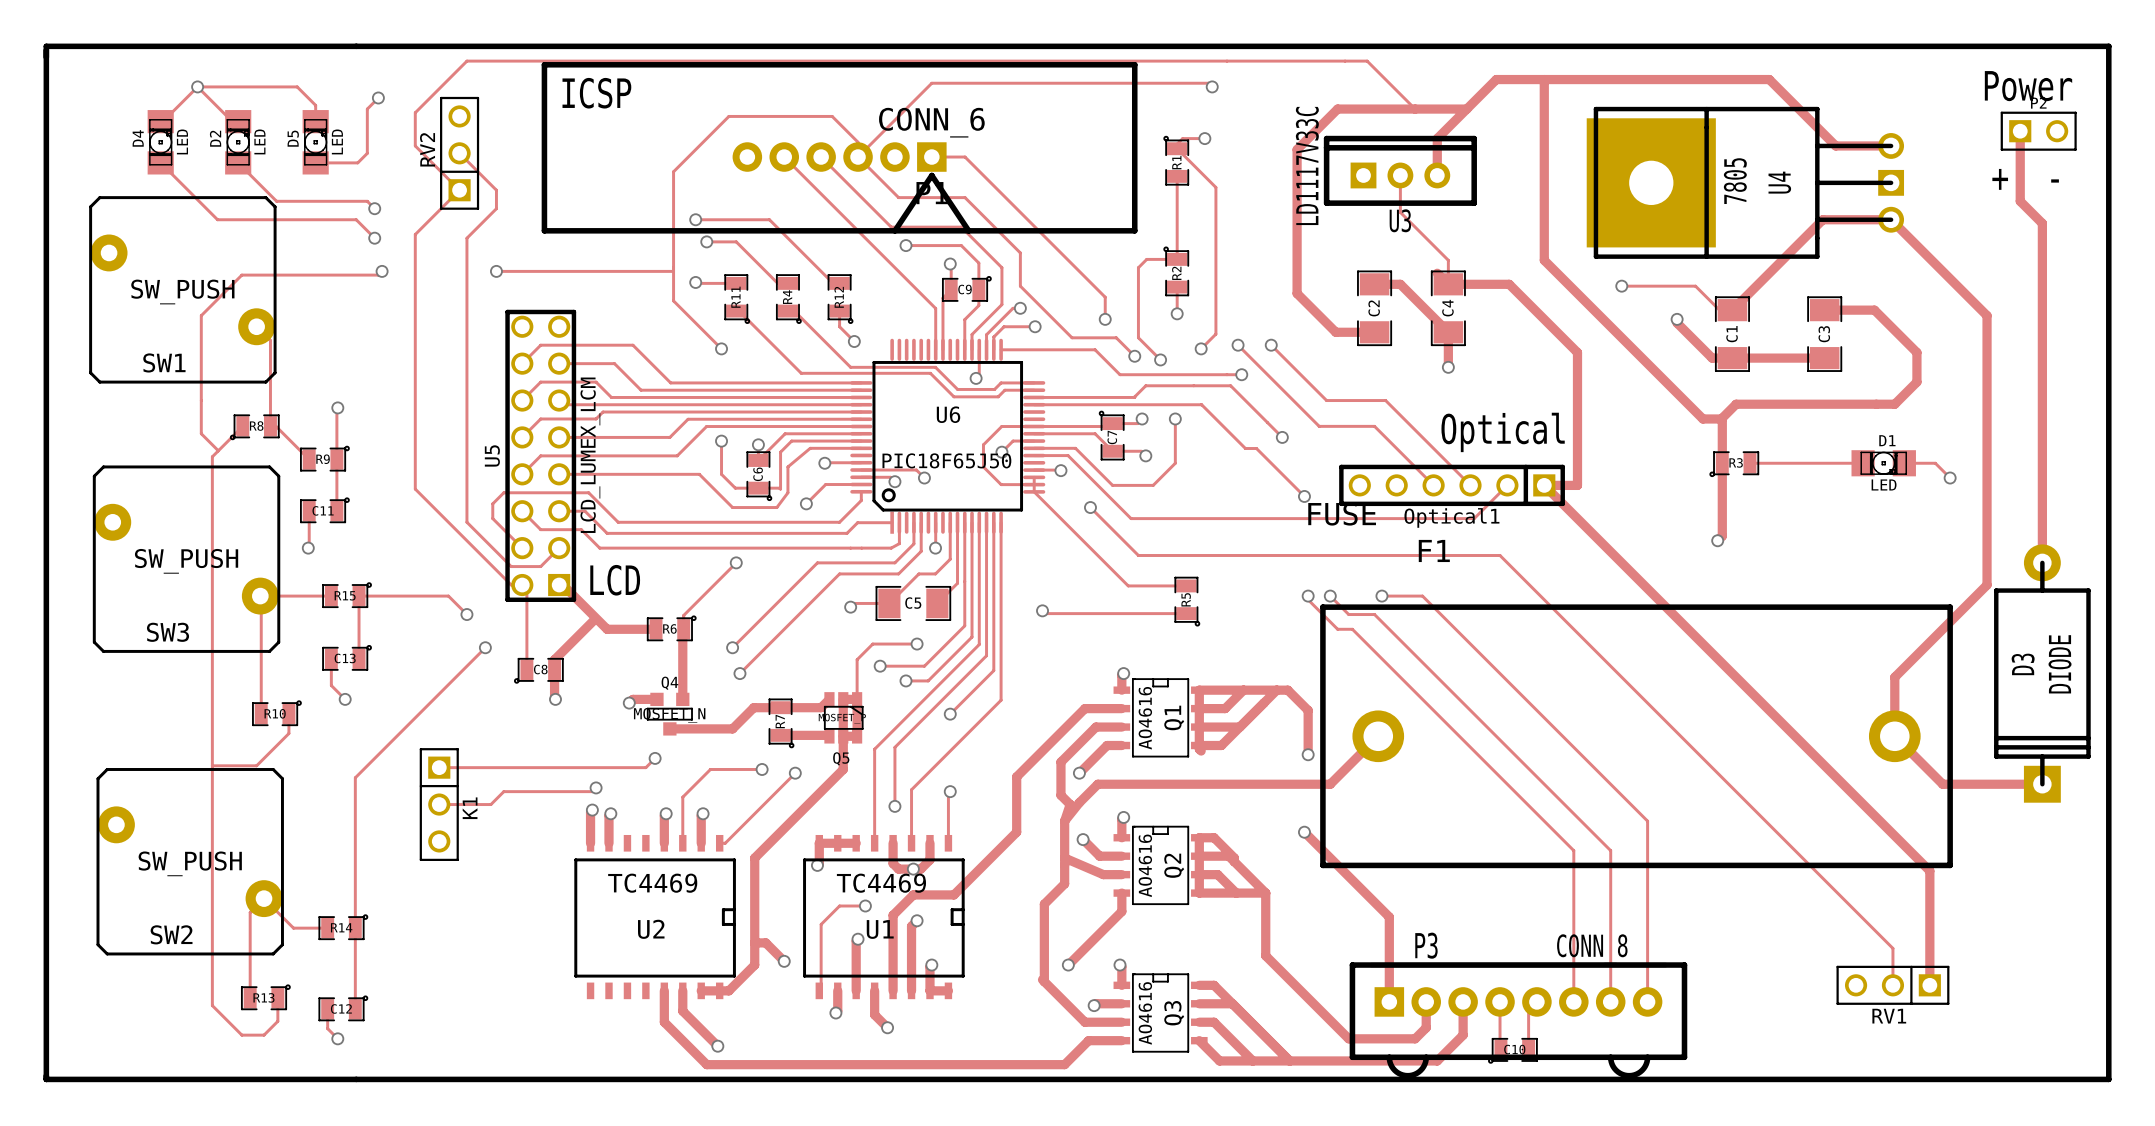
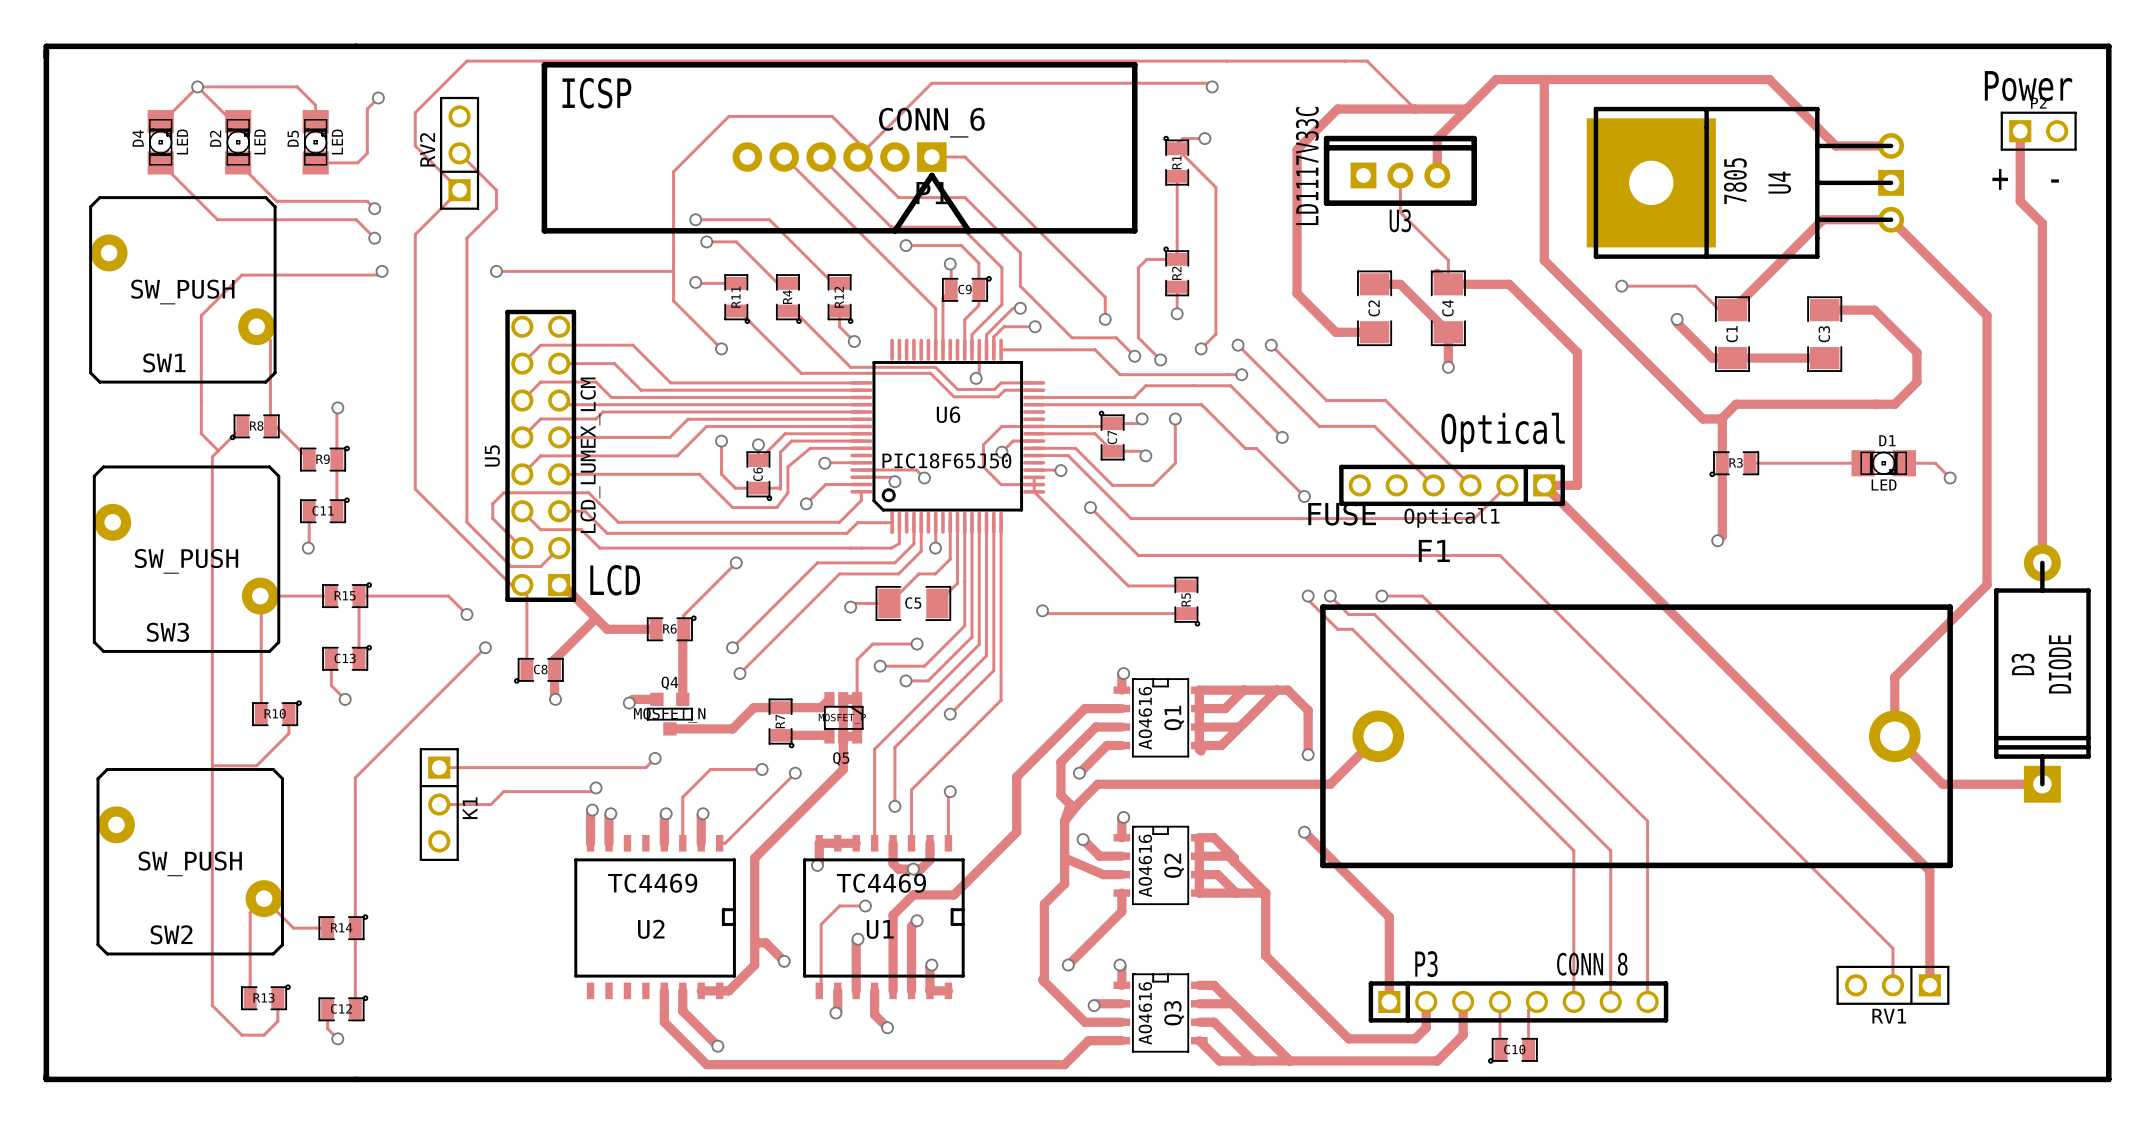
P3 name position: P3 (1426, 945) -> P3 (1426, 964)
P3 value position: CONN_8 (1592, 949) -> CONN_8 (1592, 967)
P3 footprint: [1349, 962, 1688, 1079] -> [1368, 981, 1669, 1023]

